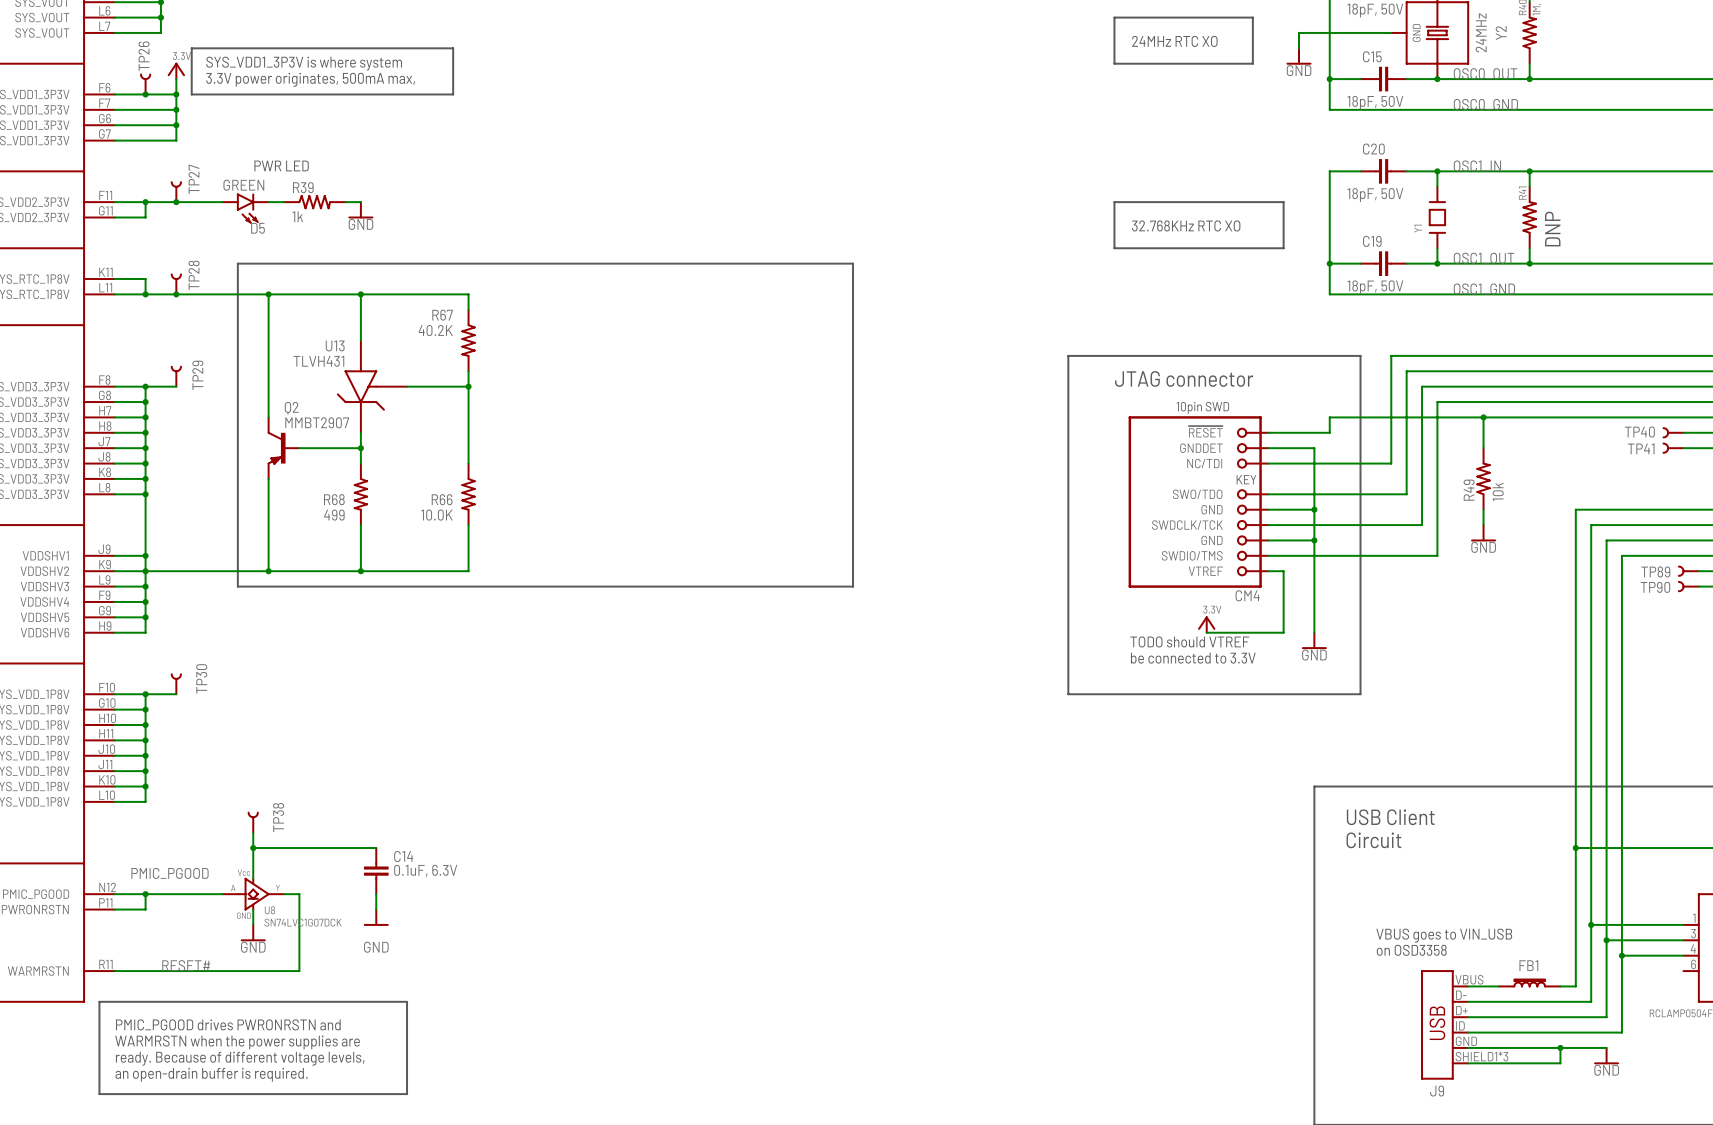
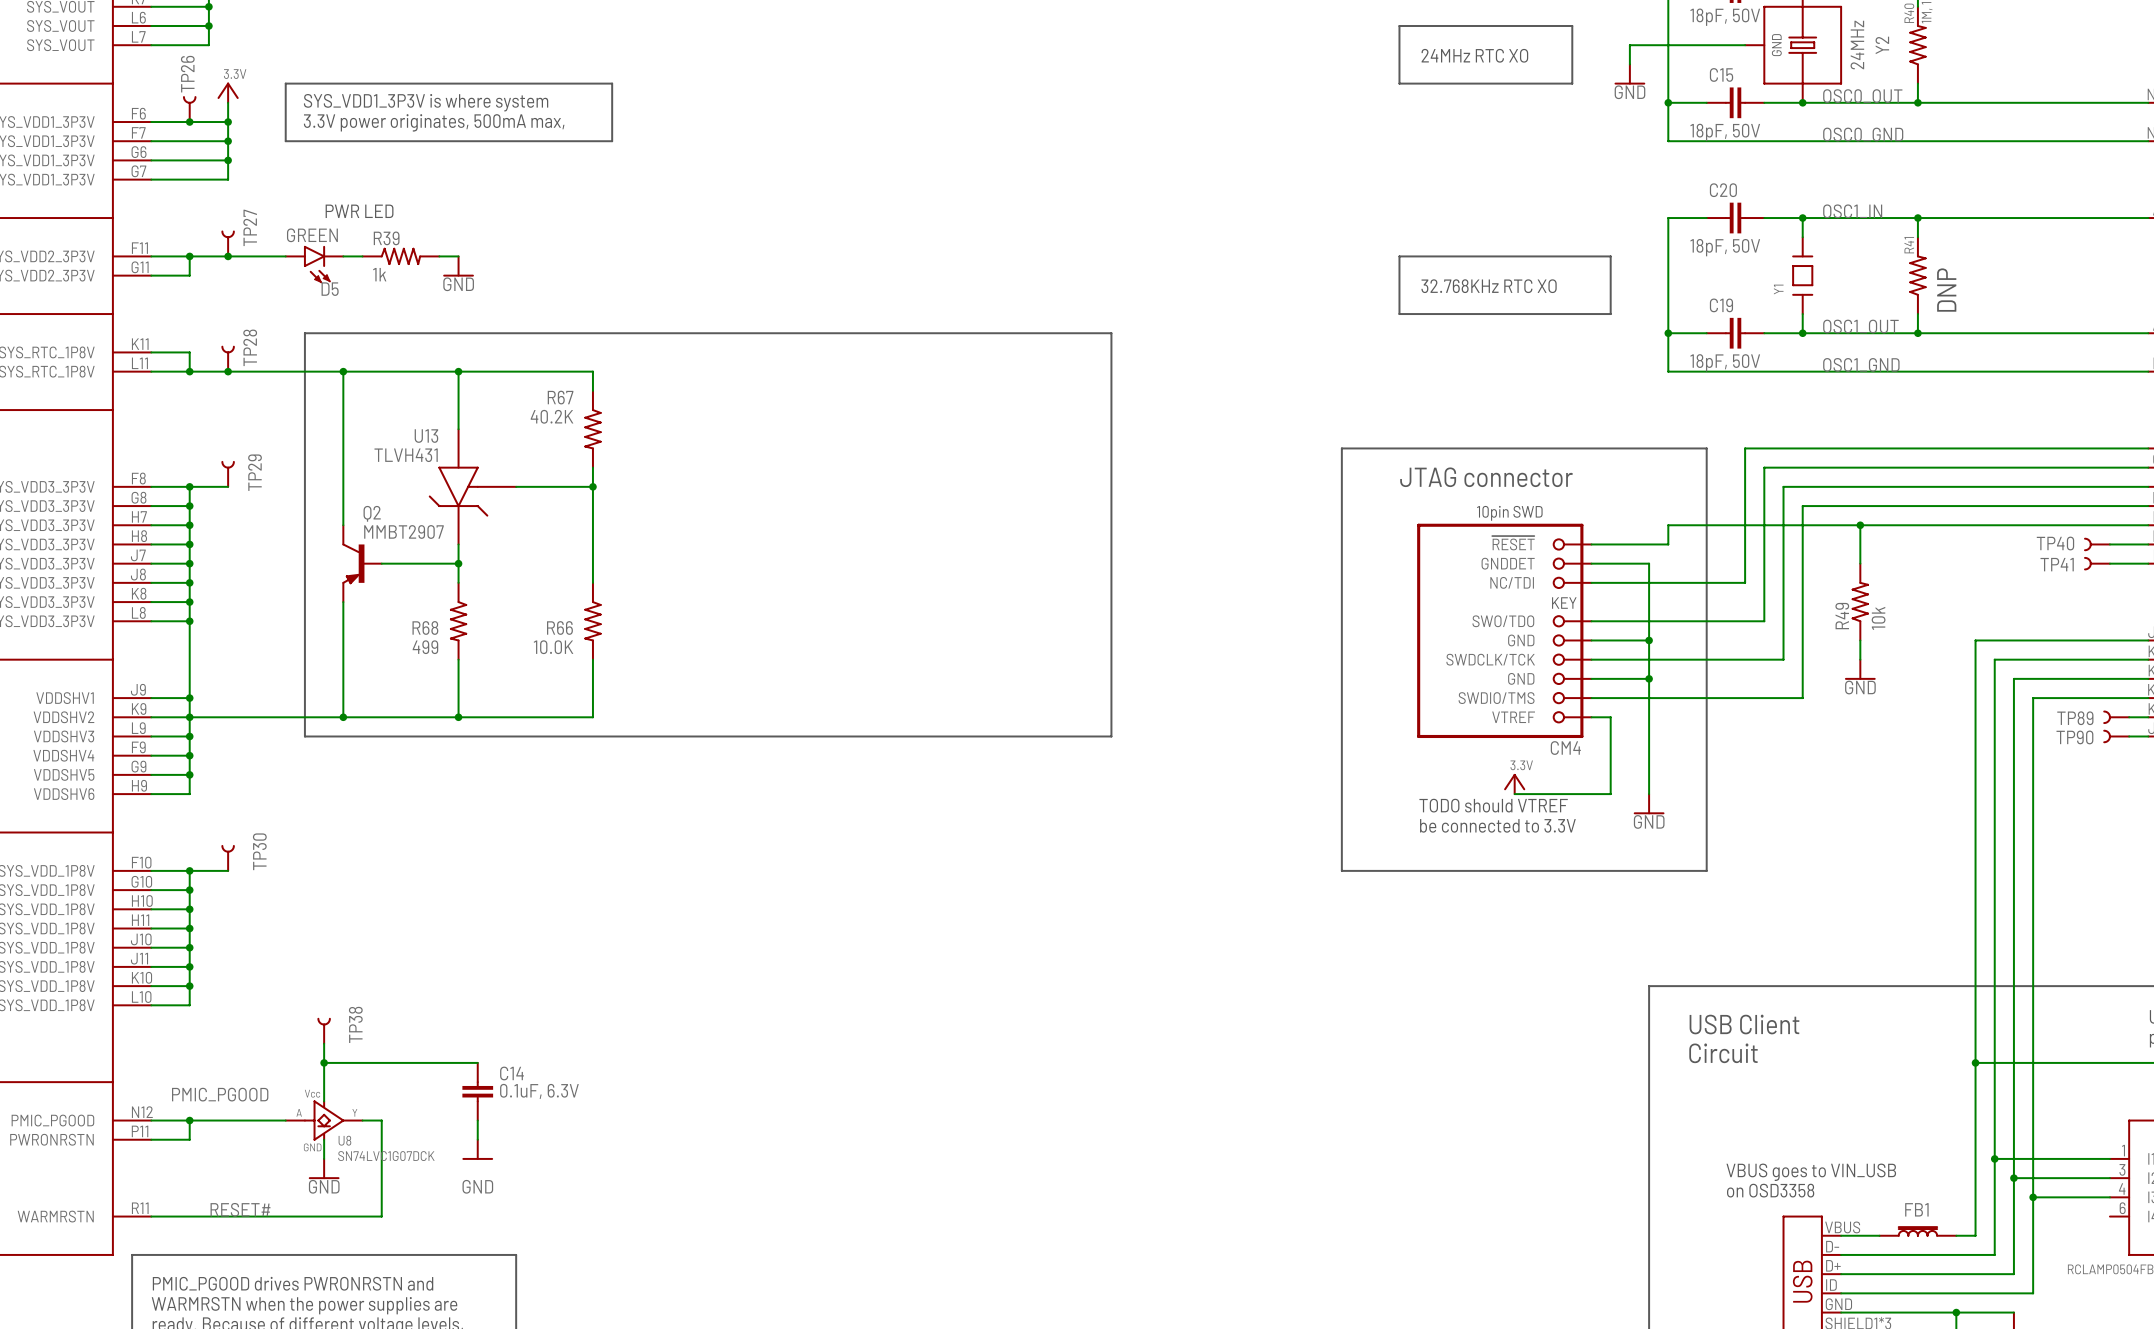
line: (191, 48) (453, 48) (453, 94) (191, 94) (191, 48) -> (285, 83) (612, 83) (612, 141) (285, 141) (285, 83)
text position: SYS_VDD1_3P3V is where system (304, 63) -> SYS_VDD1_3P3V is where system (426, 102)
text position: 3.3V power originates, 500mA max, (310, 79) -> 3.3V power originates, 500mA max, (434, 122)
line: (853, 263) (853, 586) -> (1073, 333) (1111, 333) (1111, 736) (1073, 736)

